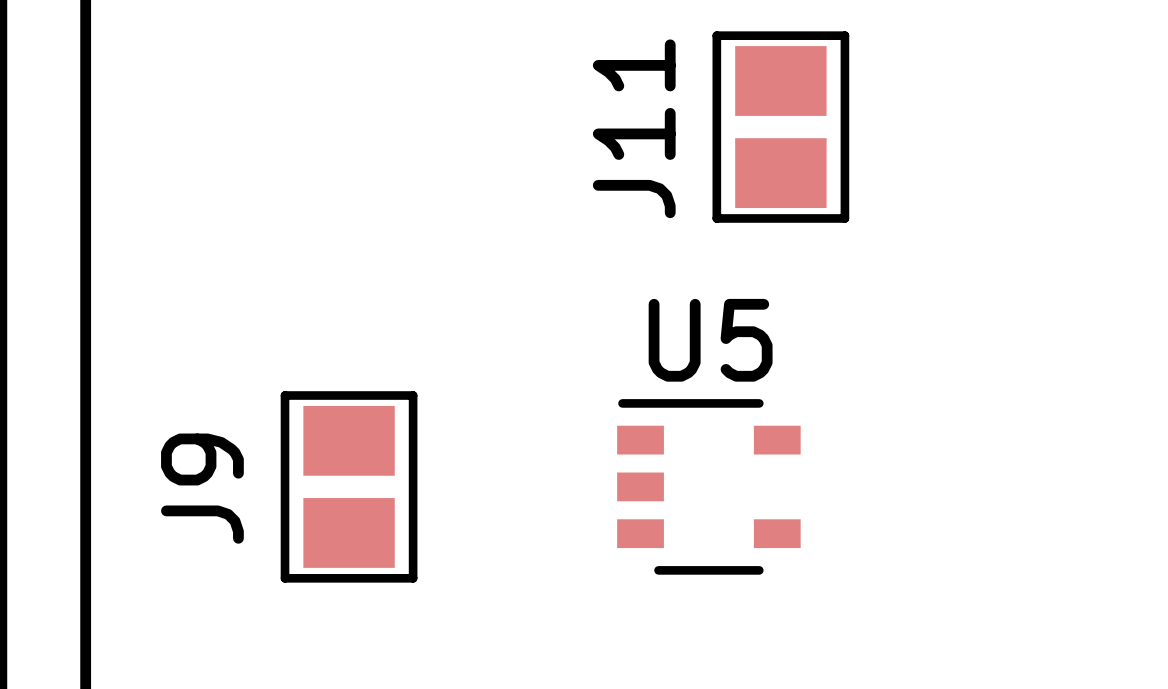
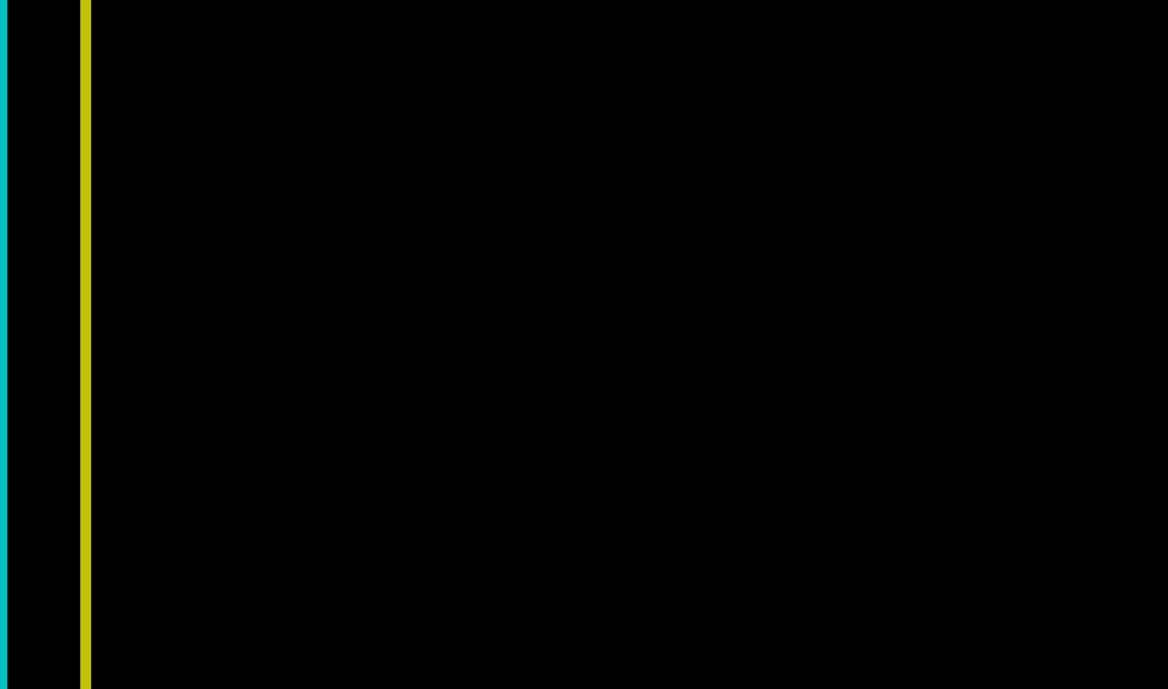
J11: (780, 127) -> none
J9: (349, 486) -> none
U5: (708, 486) -> none

